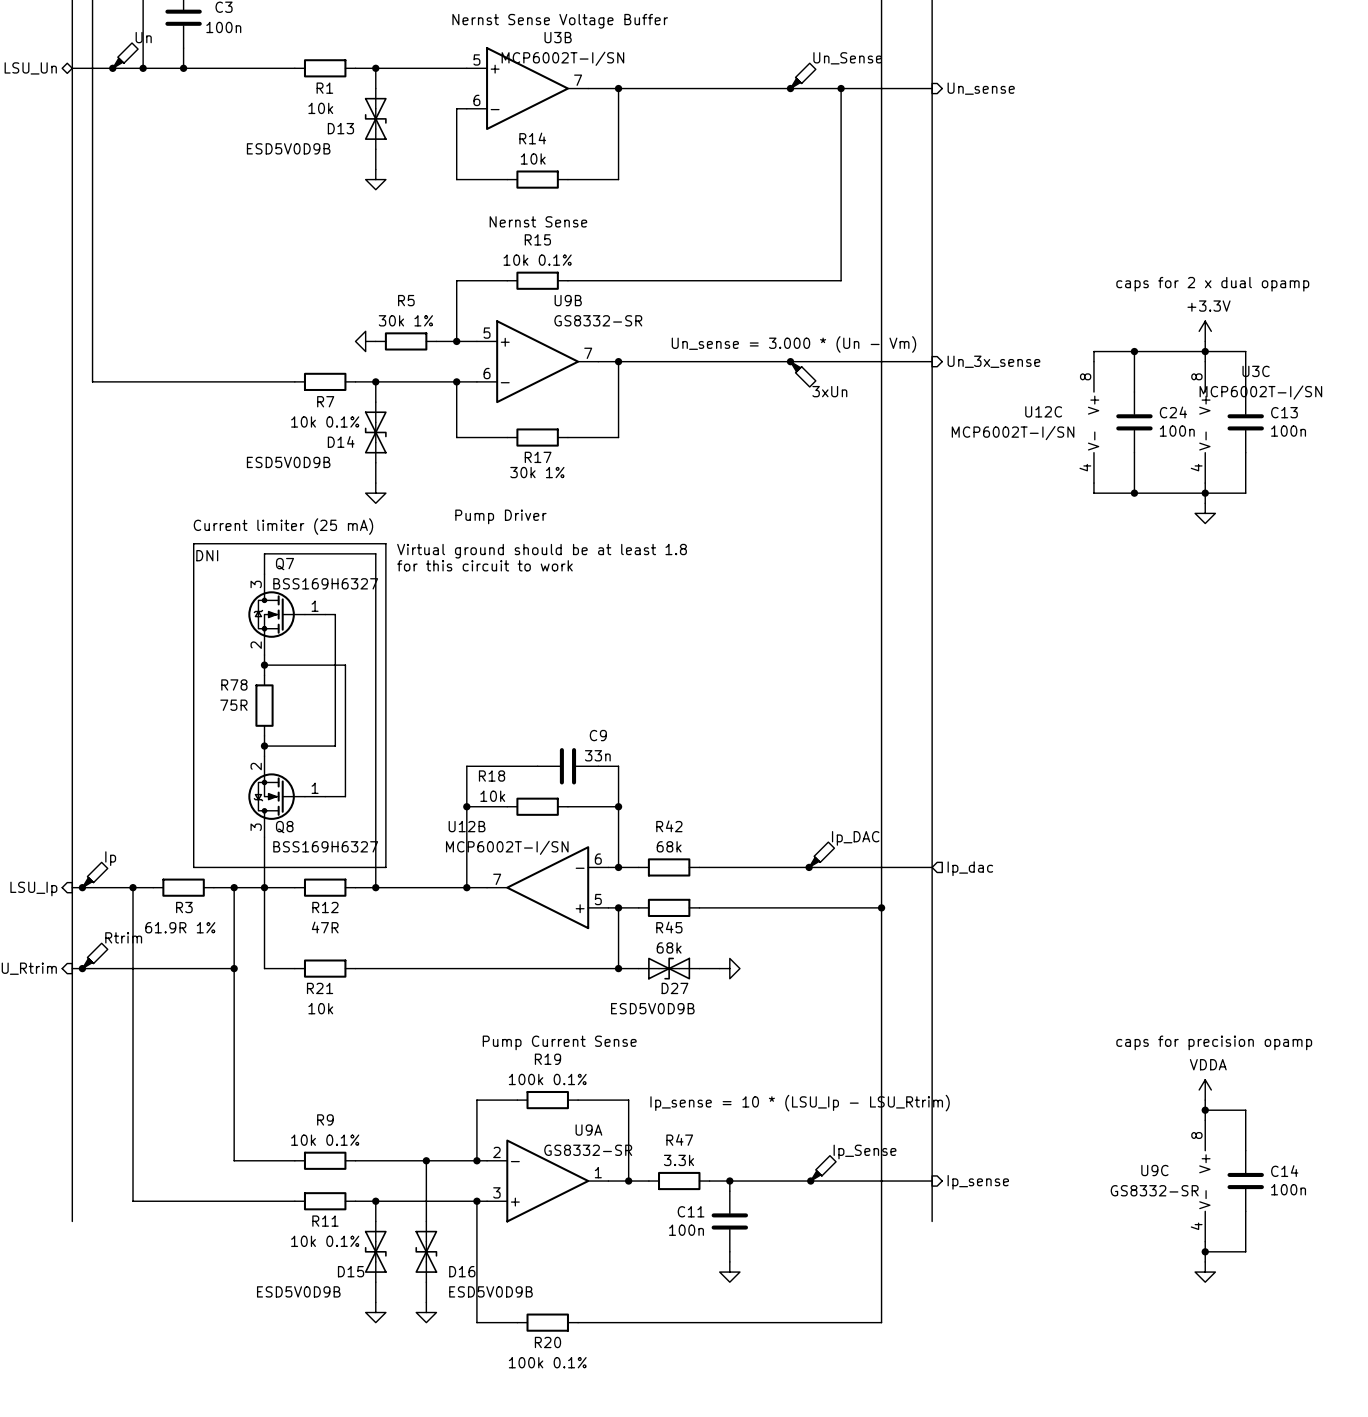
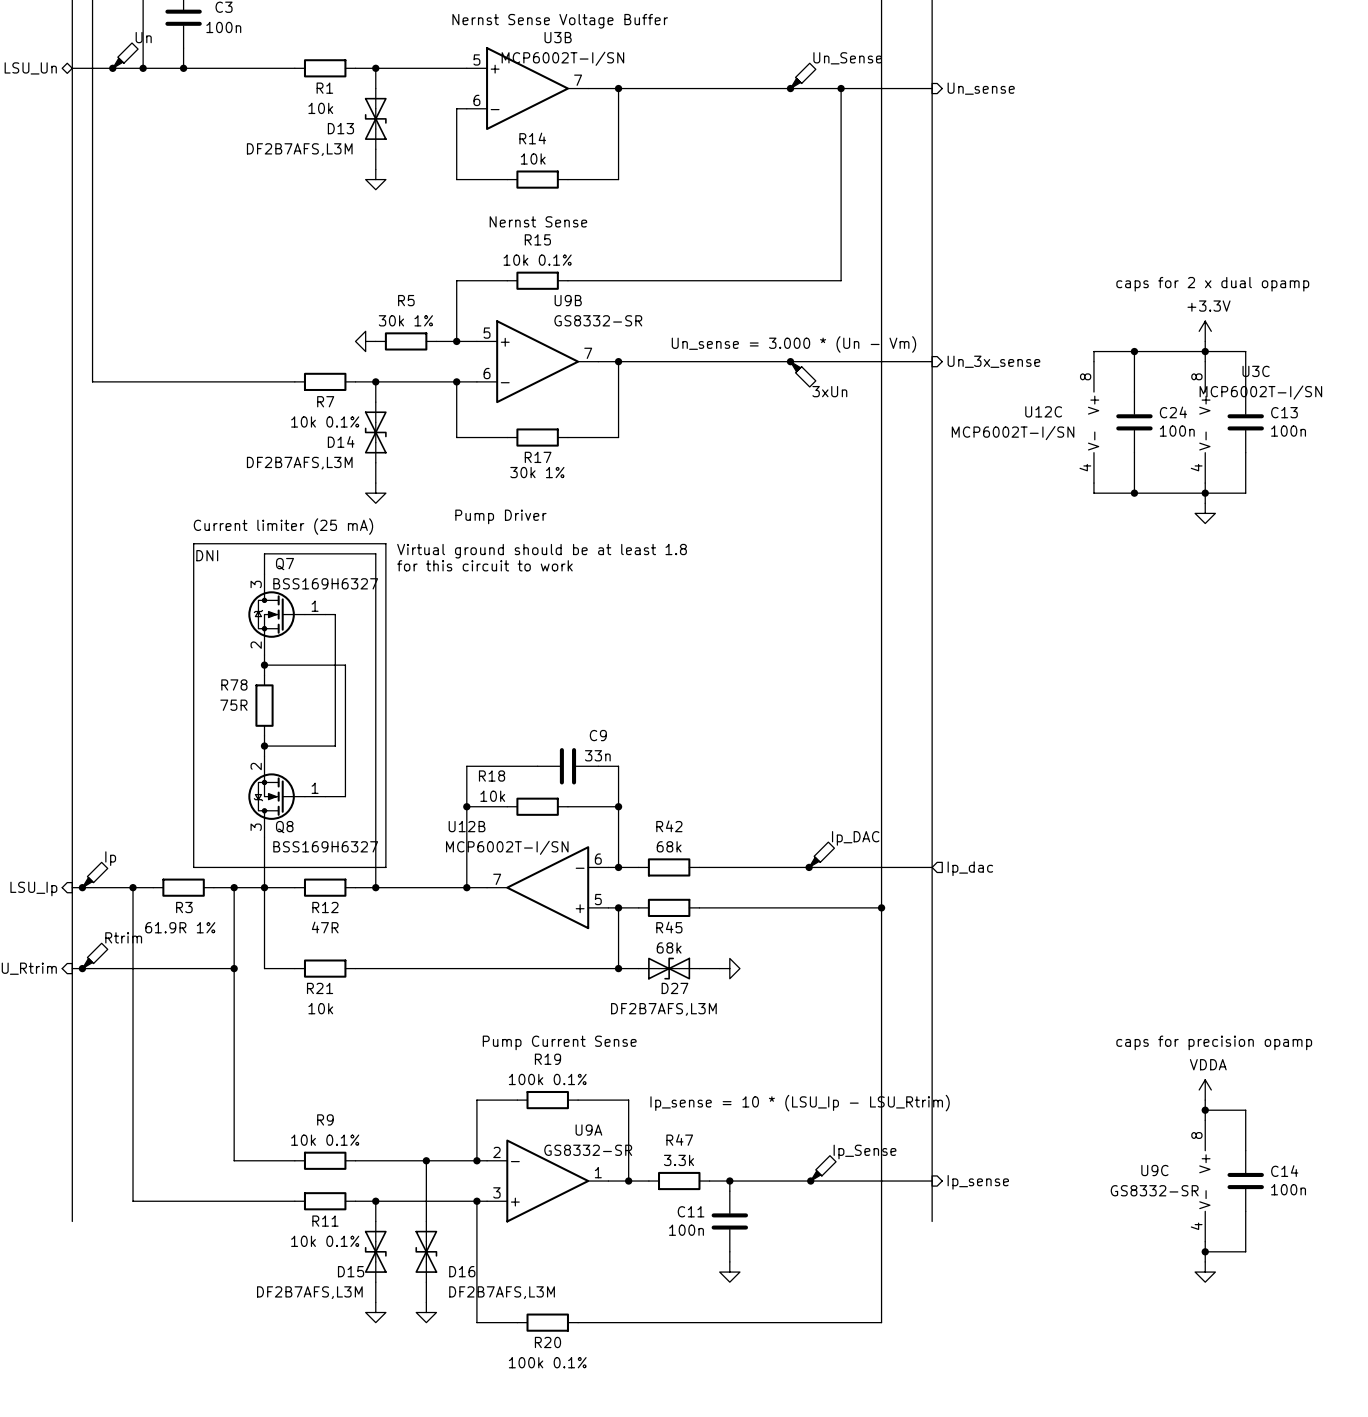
D13 value: ESD5V0D9B (288, 148) -> DF2B7AFS,L3M (299, 149)
D14 value: ESD5V0D9B (288, 462) -> DF2B7AFS,L3M (299, 463)
D27 value: ESD5V0D9B (652, 1008) -> DF2B7AFS,L3M (663, 1009)
D15 value: ESD5V0D9B (298, 1291) -> DF2B7AFS,L3M (309, 1292)
D16 value: ESD5V0D9B (490, 1291) -> DF2B7AFS,L3M (502, 1292)

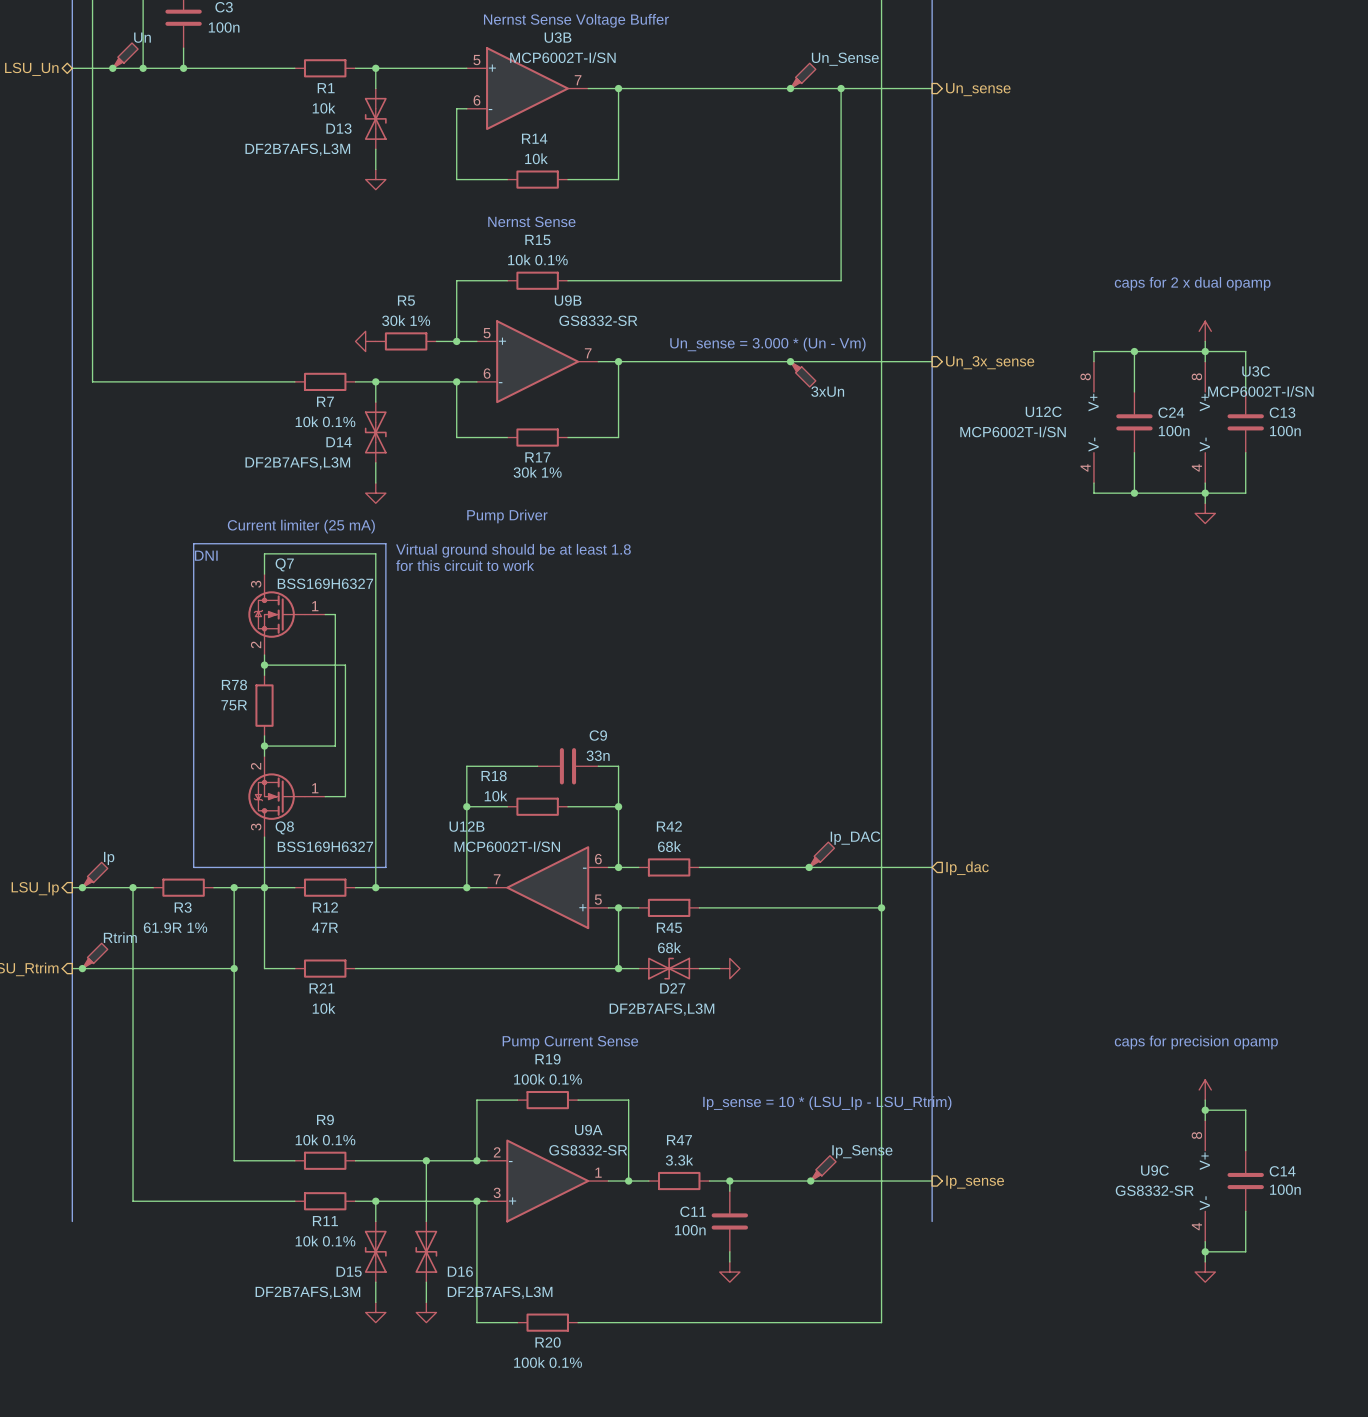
power symbol text: +3.3V (1209, 306) -> none
power symbol text: VDDA (1208, 1064) -> none

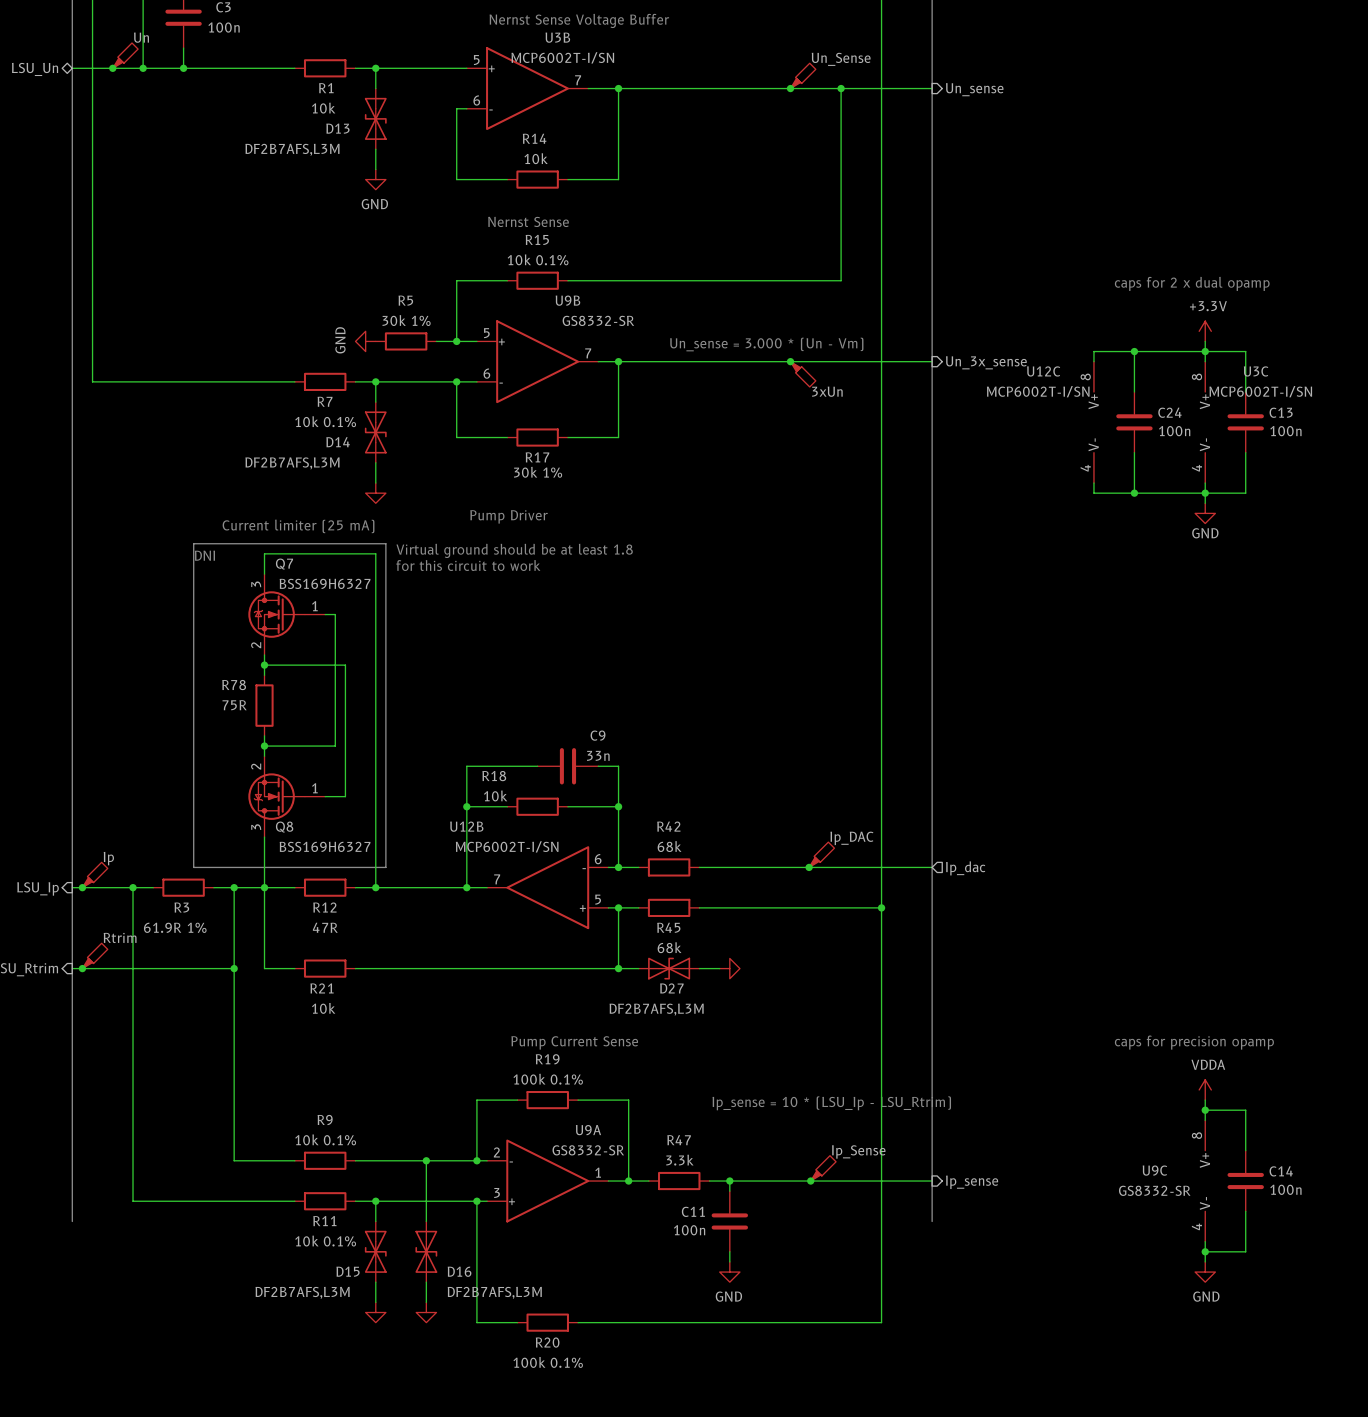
power symbol text: none -> GND (374, 204)
power symbol text: none -> +3.3V (1208, 306)
power symbol text: none -> GND (340, 340)
U12C name position: U12C (1043, 411) -> U12C (1043, 371)
U12C value position: MCP6002T-I/SN (1013, 431) -> MCP6002T-I/SN (1038, 391)
power symbol text: none -> GND (1205, 533)
power symbol text: none -> VDDA (1208, 1064)
power symbol text: none -> GND (728, 1296)
power symbol text: none -> GND (1206, 1296)

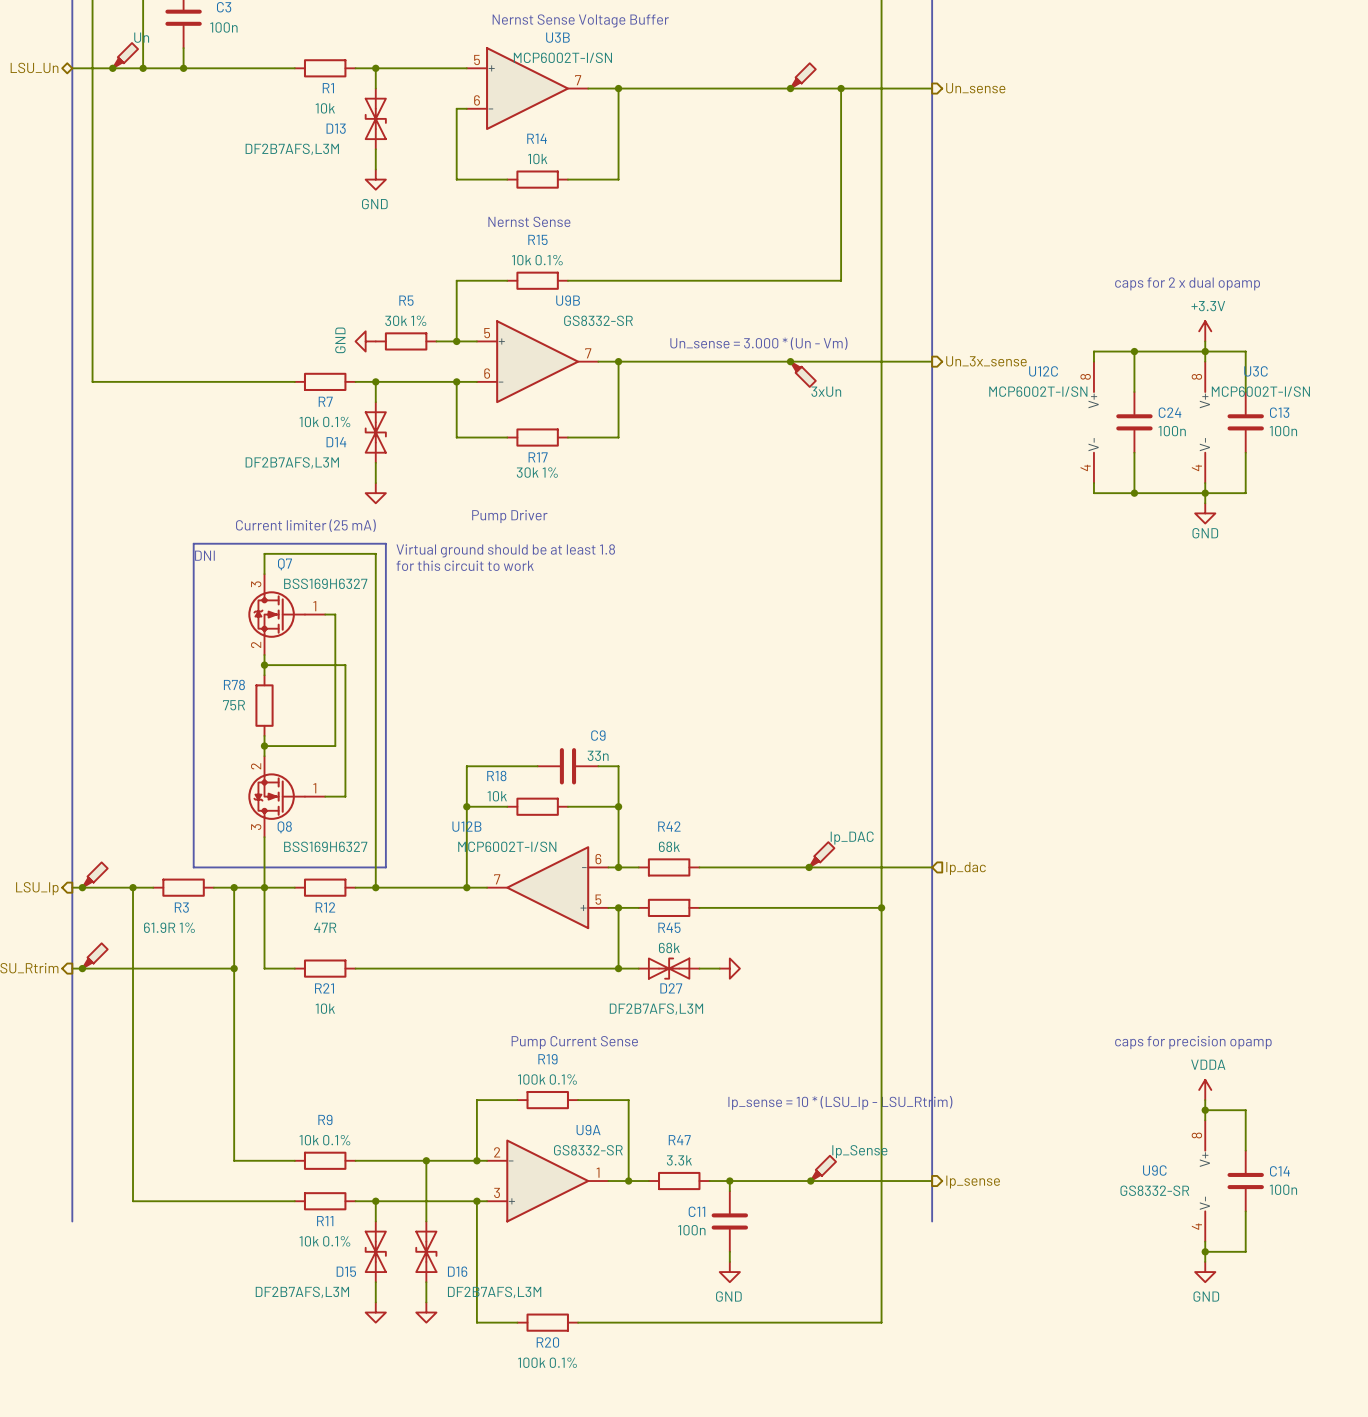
part value: Un_Sense (841, 59) -> none
part value: Ip (108, 858) -> none
part value: Rtrim (120, 937) -> none

